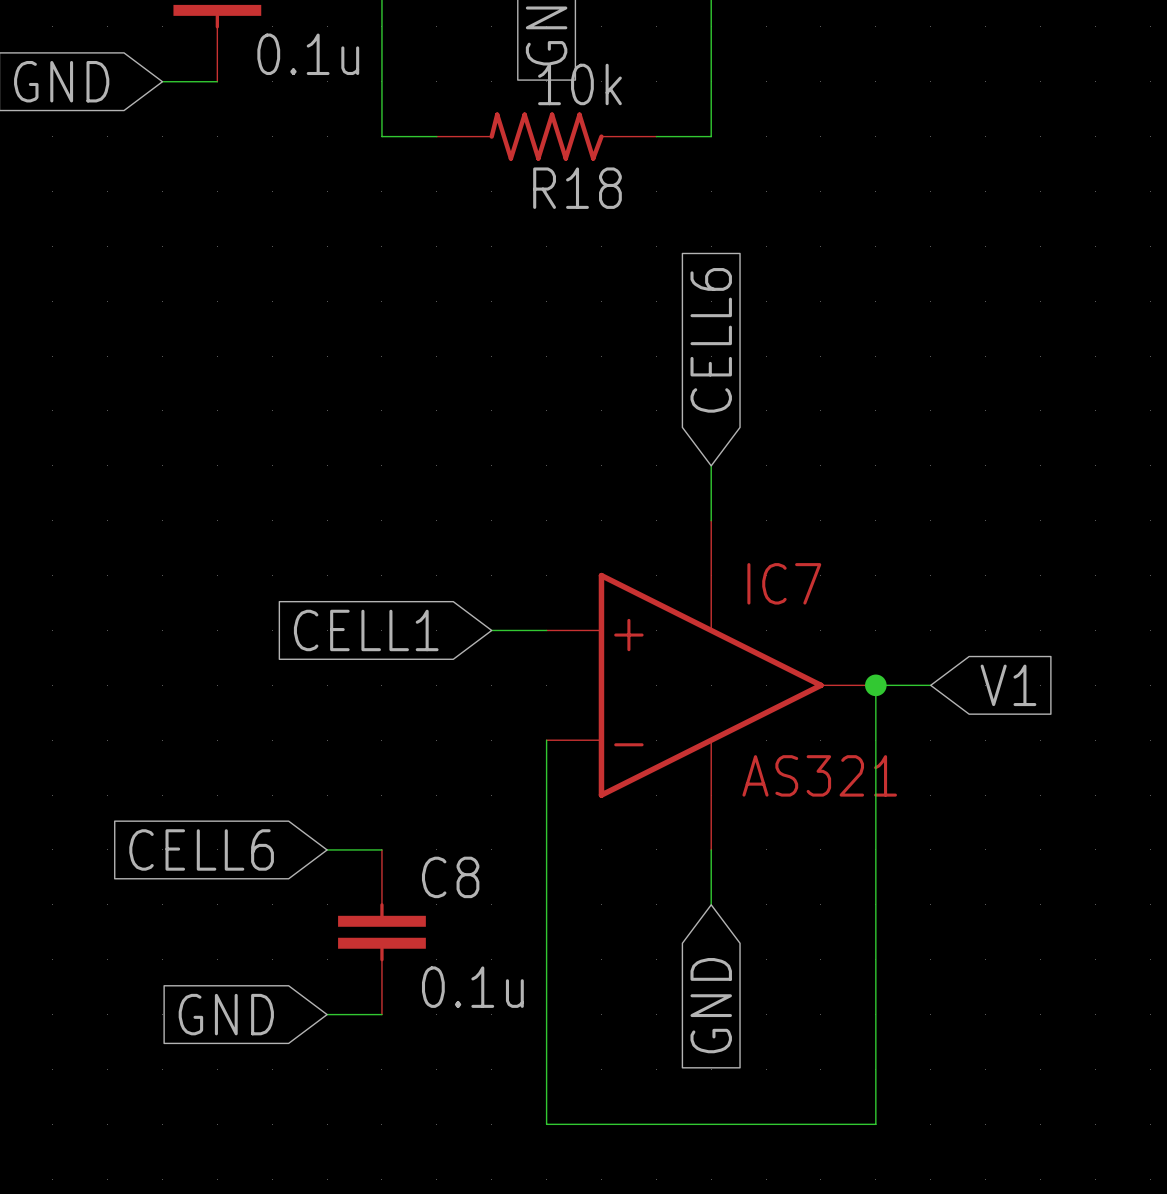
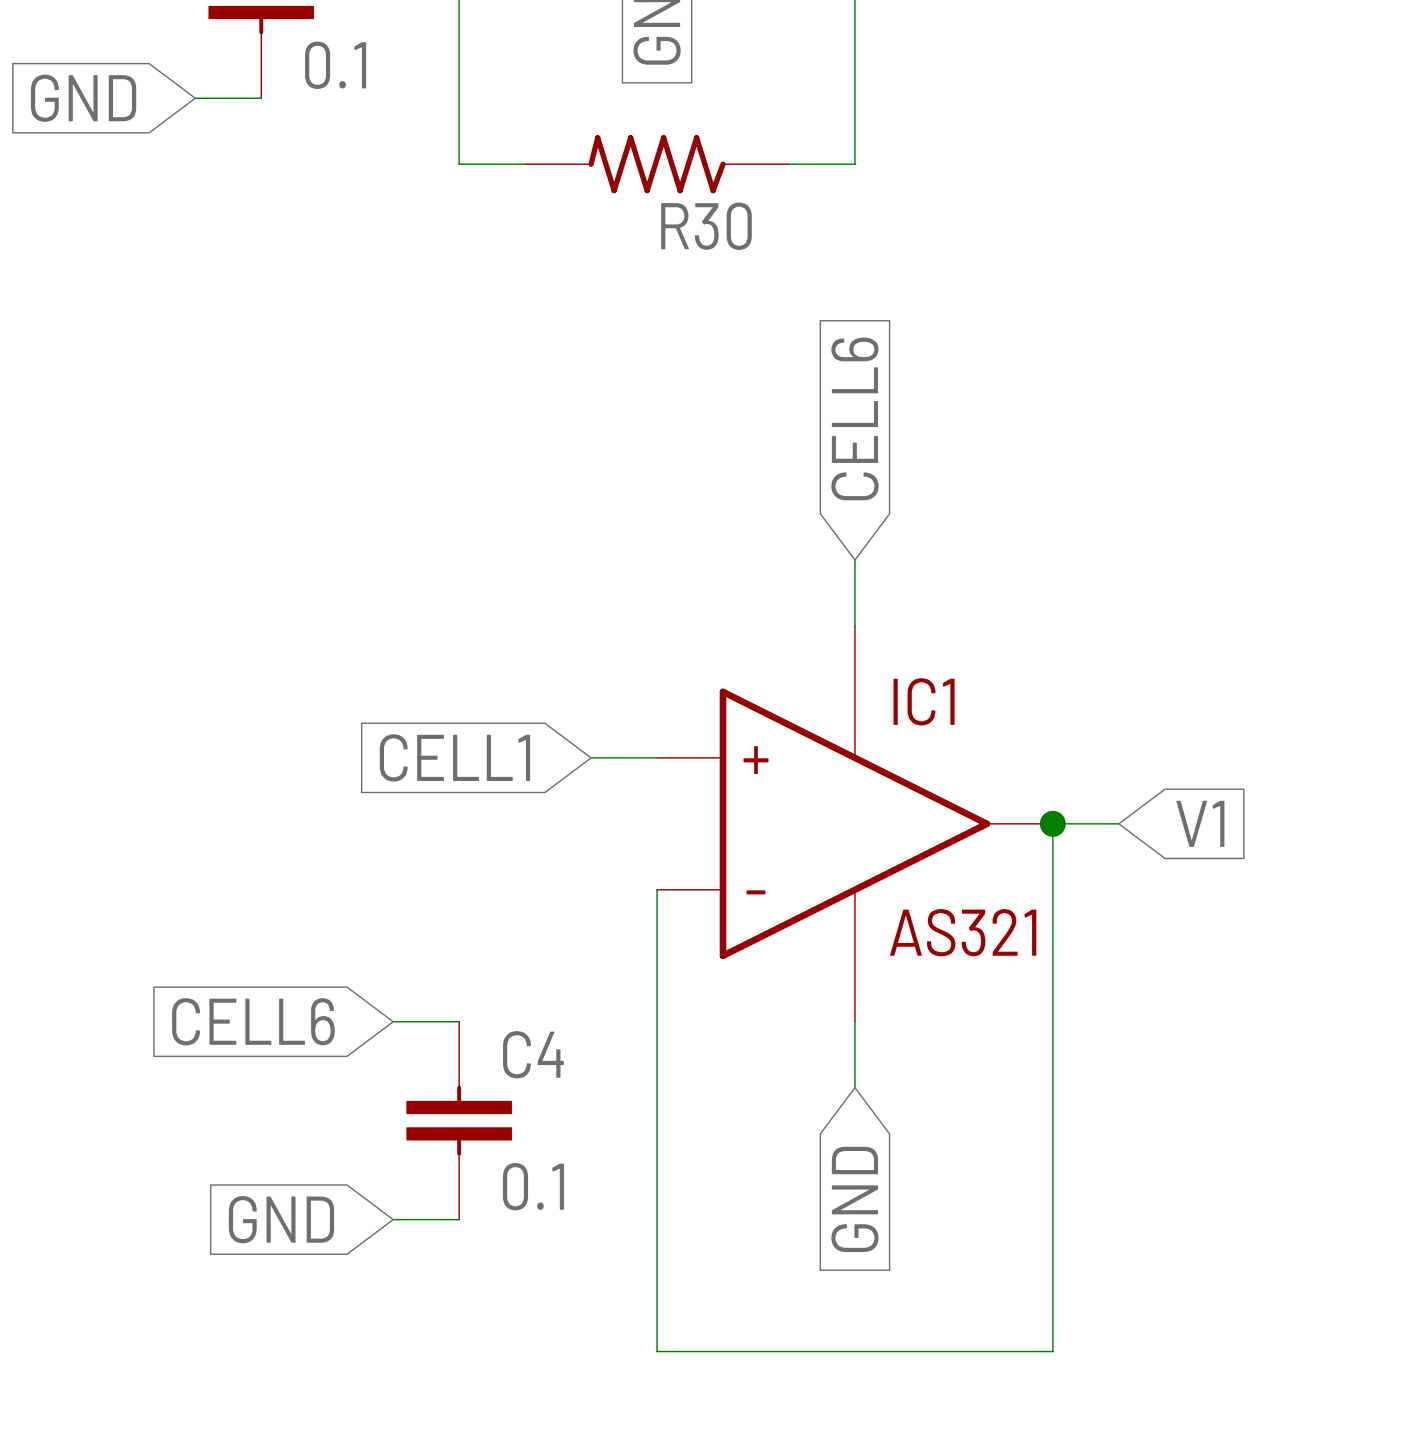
part value: 0.1u (308, 54) -> 0.1 (335, 65)
R18 value: 10k (579, 84) -> none
R18 name: R18 (577, 188) -> R30 (706, 226)
IC7 name: IC7 (784, 583) -> IC1 (924, 701)
C8 name: C8 (450, 877) -> C4 (533, 1054)
C8 value: 0.1u (472, 987) -> 0.1 (533, 1186)

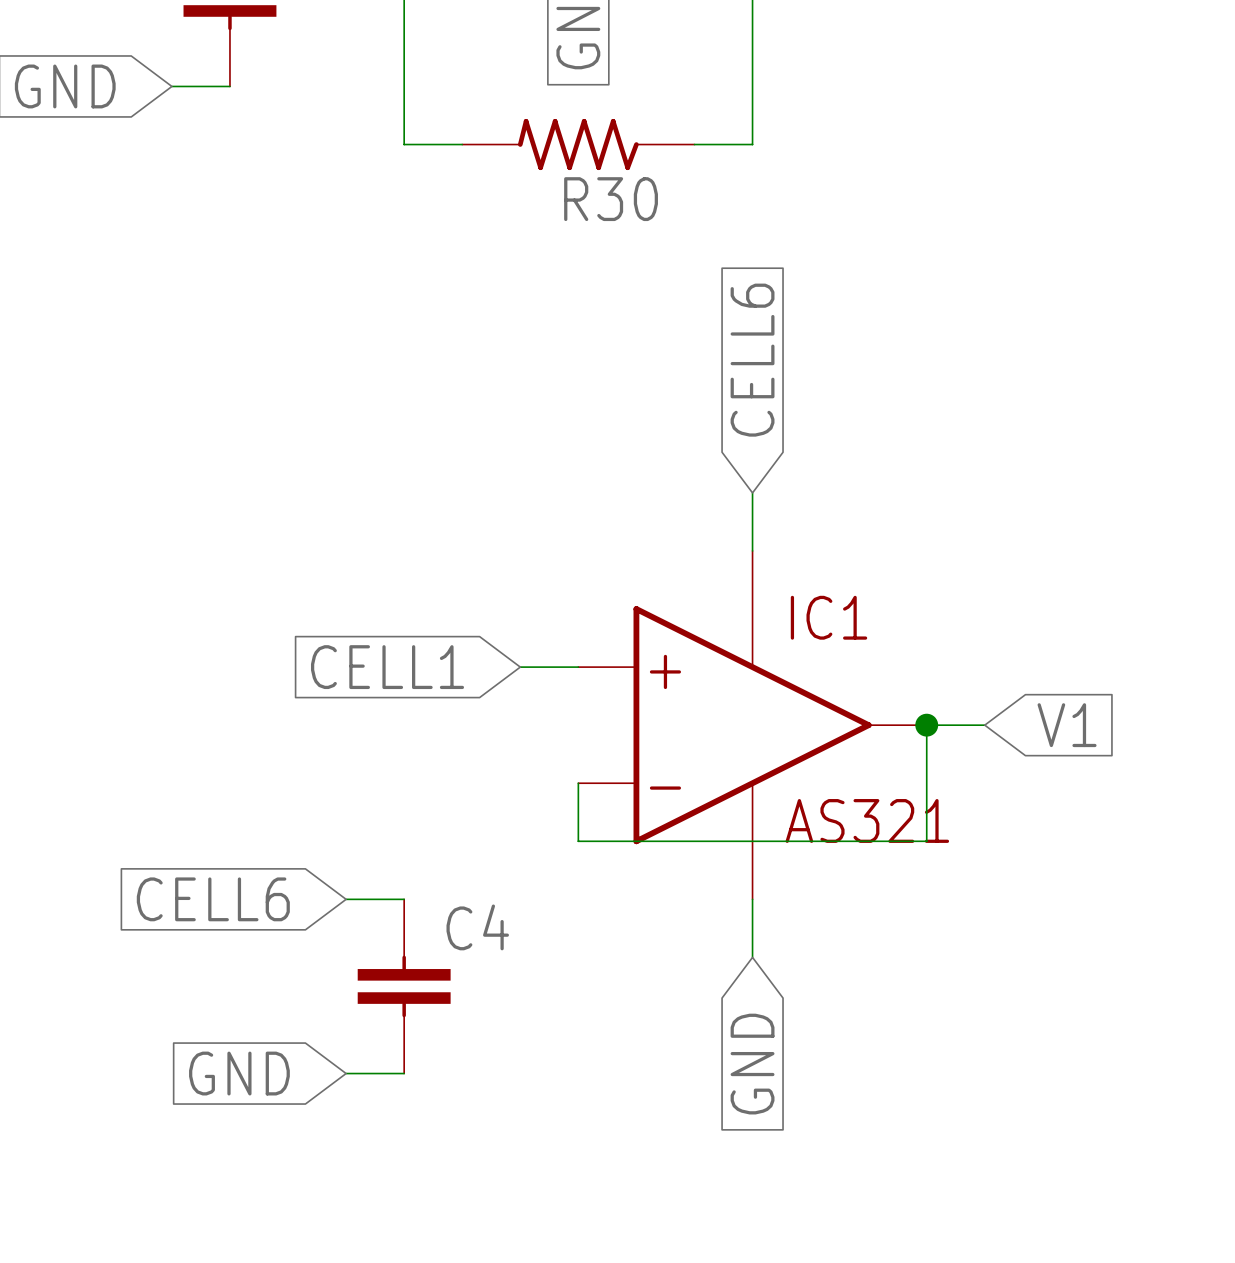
part value: 0.1 (335, 65) -> none
wire: (657, 955) (657, 1351) (1052, 1351) (1052, 955) -> (578, 841) (926, 841)
C4 value: 0.1 (533, 1186) -> none

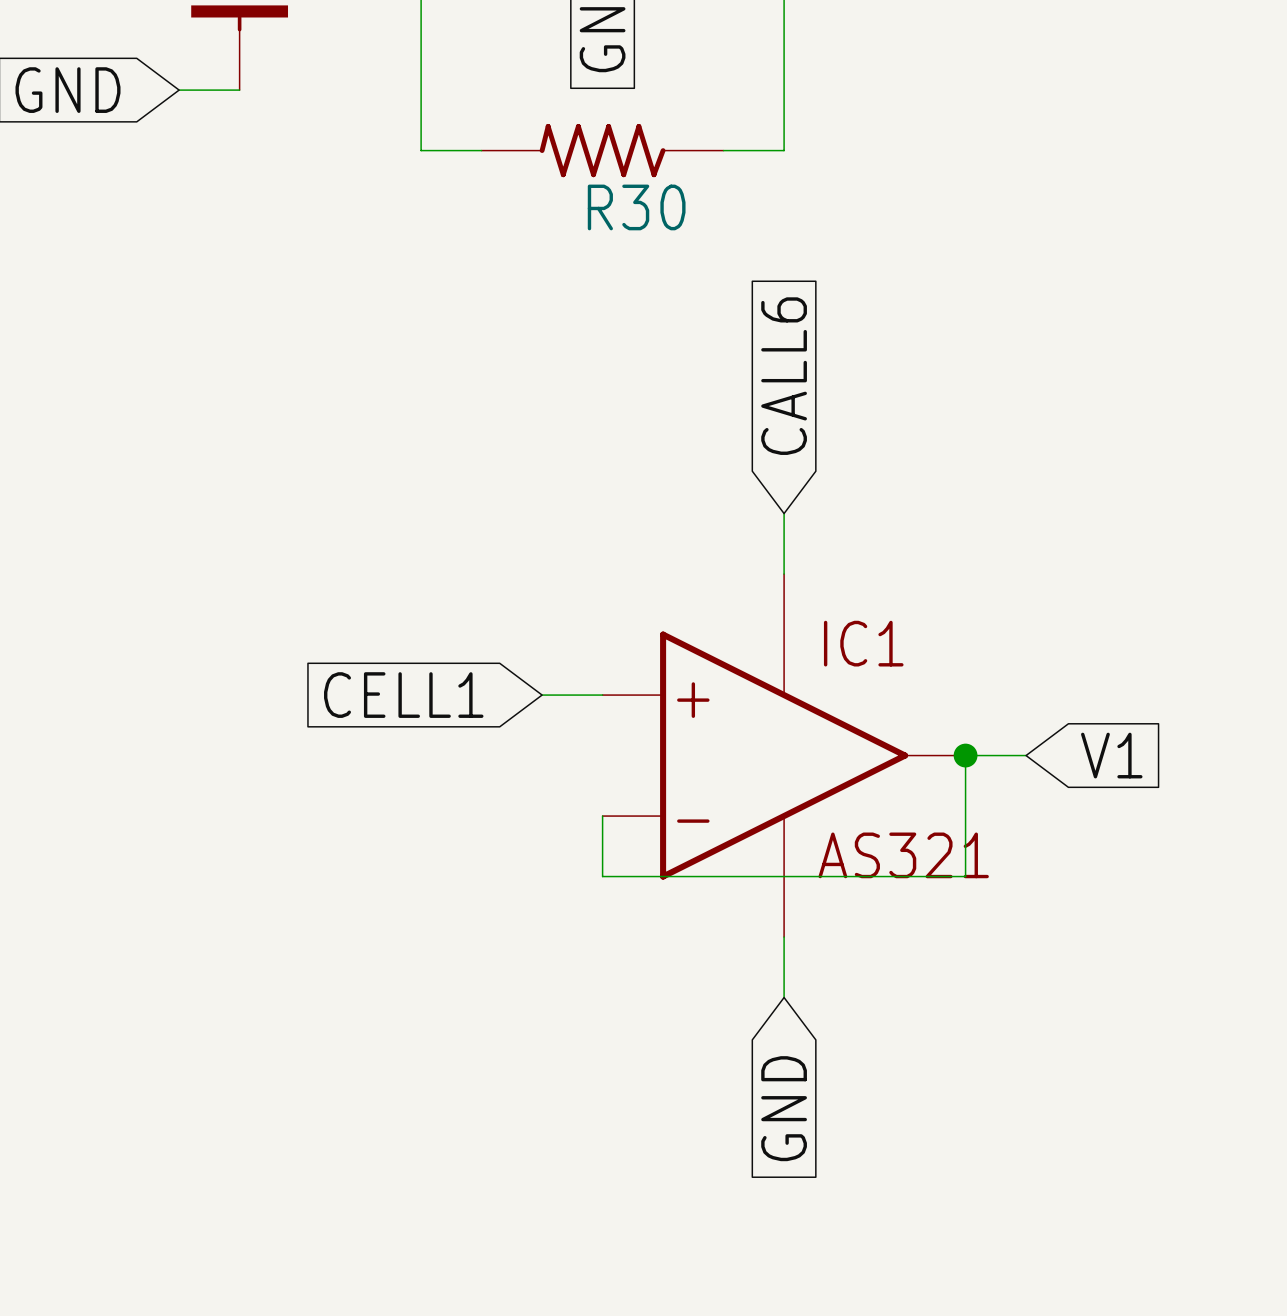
global label: CELL6 (752, 360) -> CALL6 (784, 376)
global label: CELL6 (213, 899) -> none
wire: (346, 899) (404, 899) -> none
C4: (404, 986) -> none
global label: GND (239, 1073) -> none
wire: (346, 1073) (404, 1073) -> none

